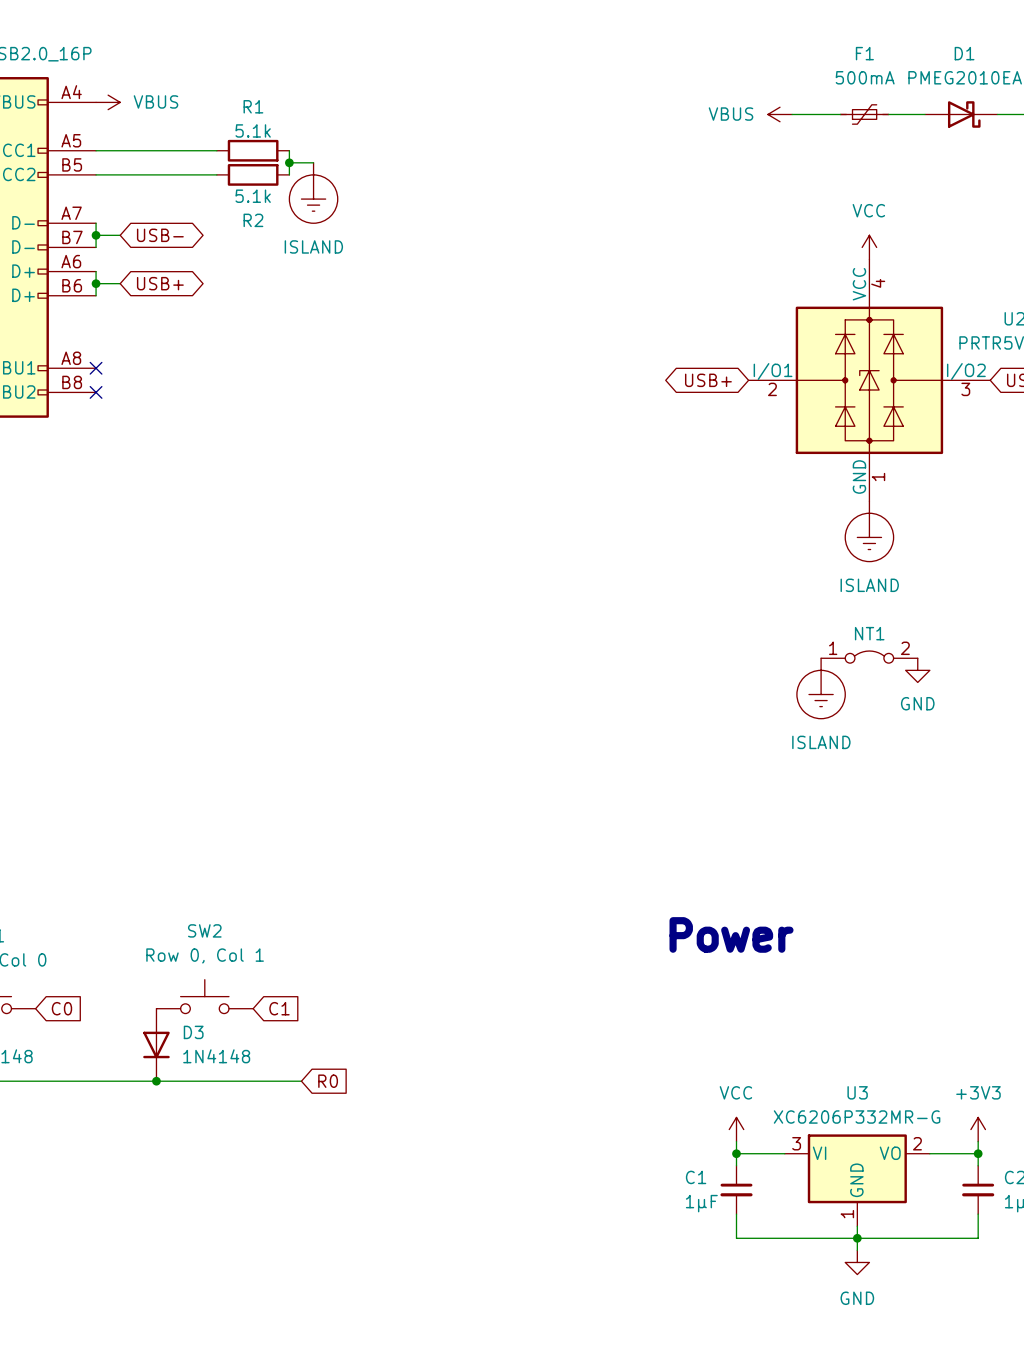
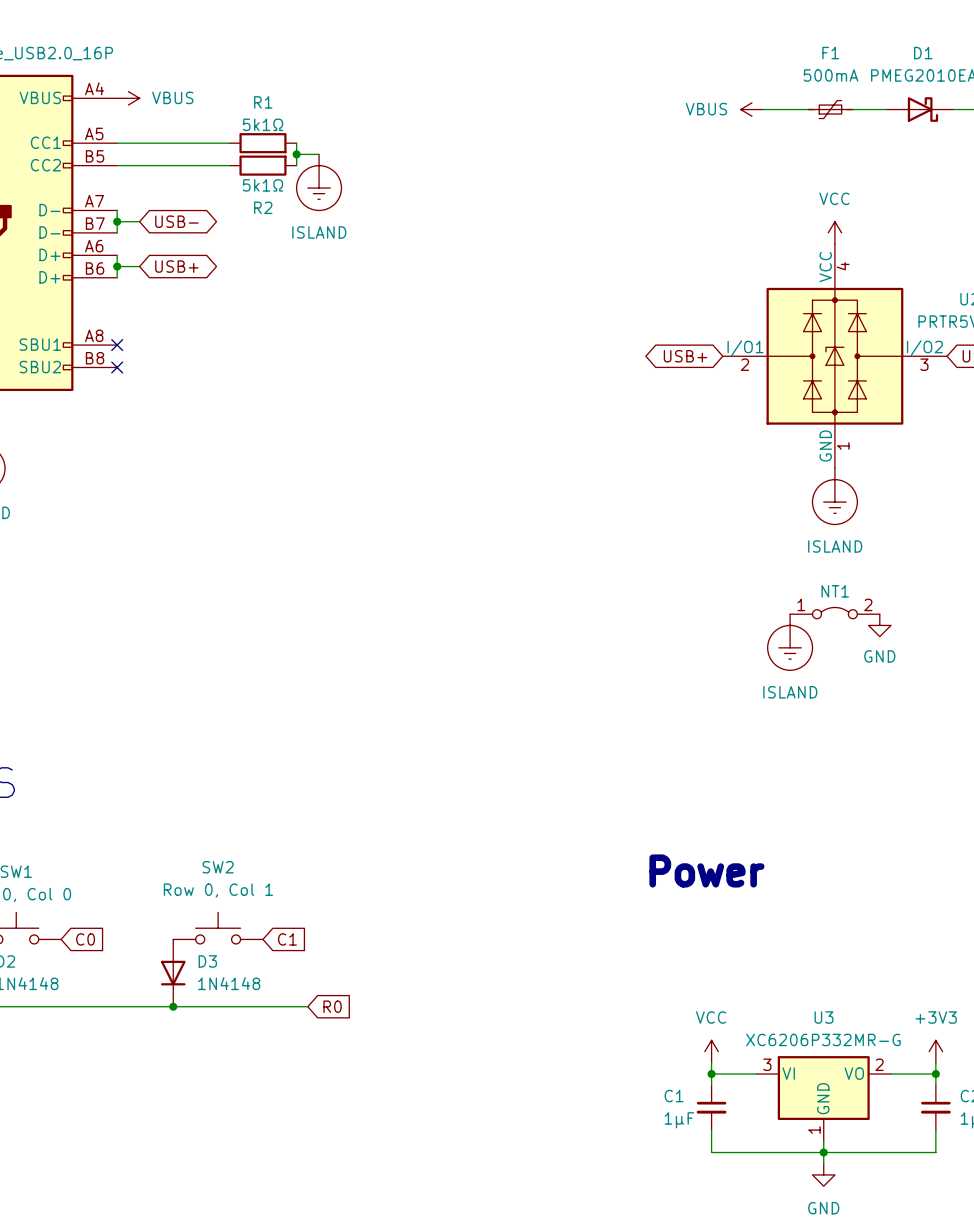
R1 value: 5.1k (253, 130) -> 5k1Ω (262, 124)
R2 value: 5.1k (253, 196) -> 5k1Ω (262, 185)

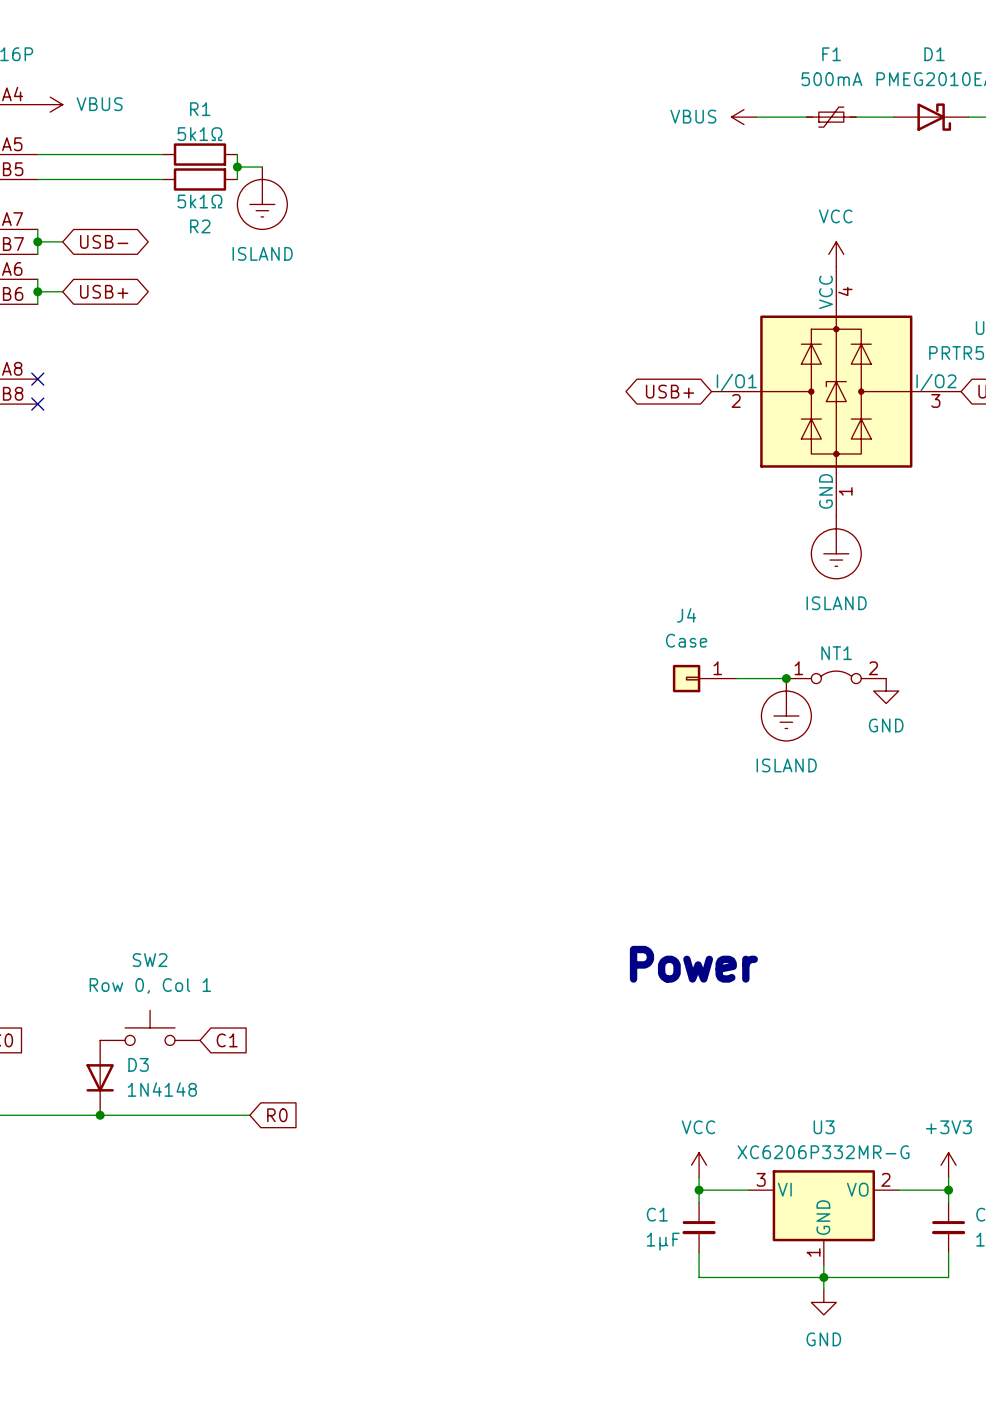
J4: none -> Case (704, 678)
wire: none -> (736, 678) (786, 678)
junction: none -> (786, 678)

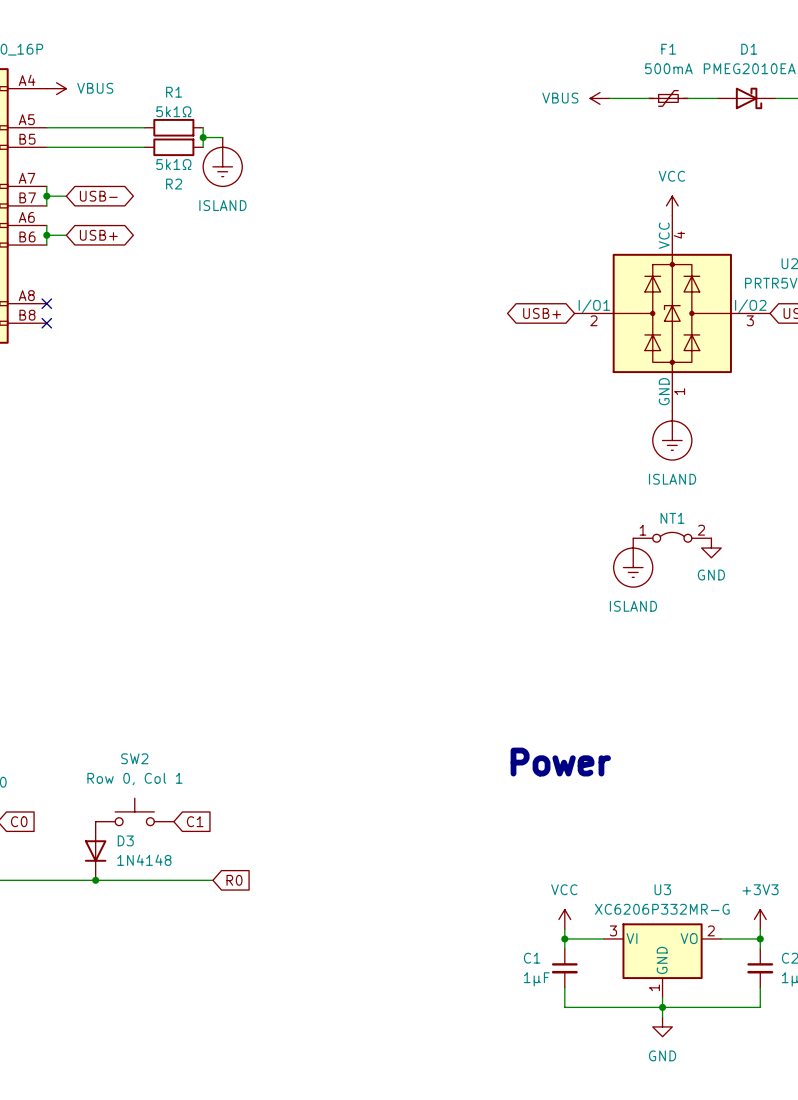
J4: Case (704, 678) -> none
wire: (736, 678) (786, 678) -> none
junction: (786, 678) -> none

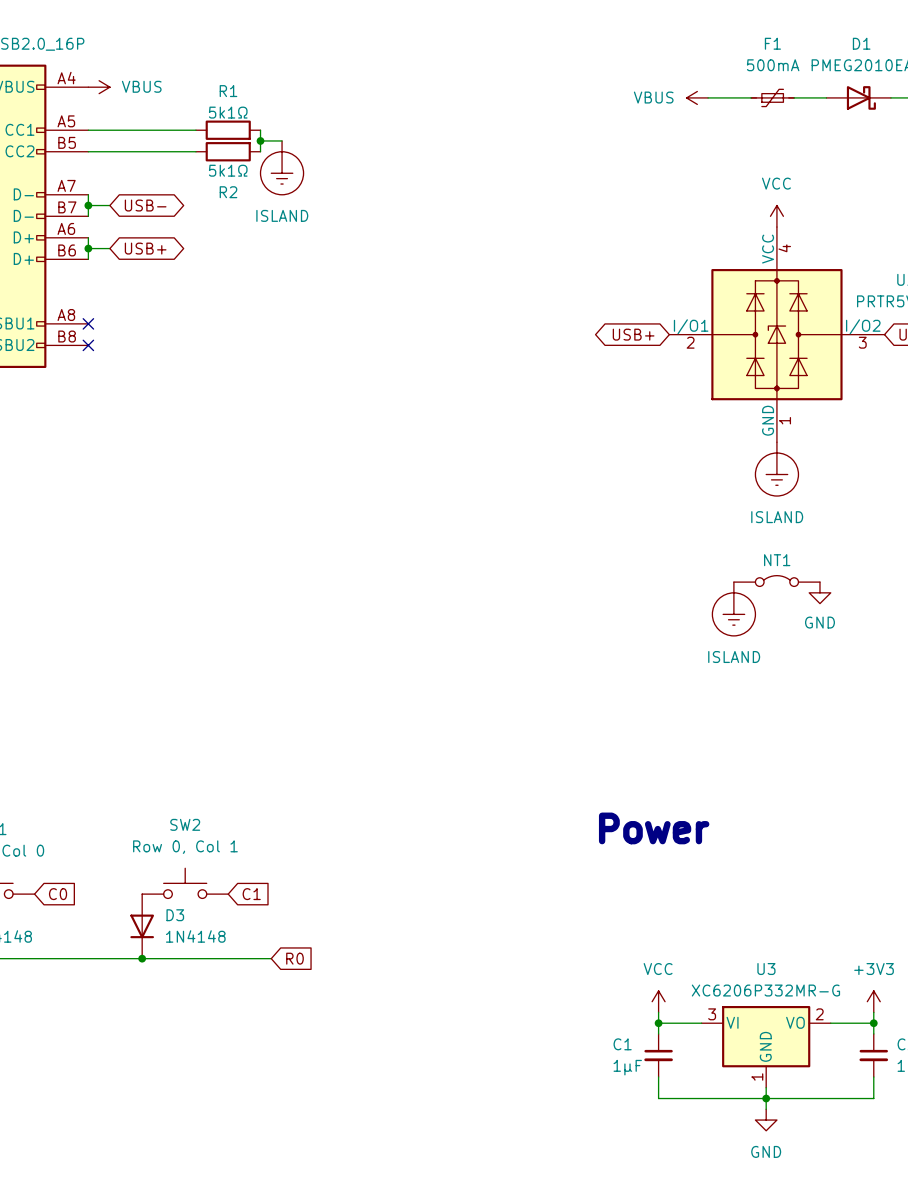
NT1 pin number: 1 (642, 530) -> none
NT1 pin number: 2 (701, 530) -> none

